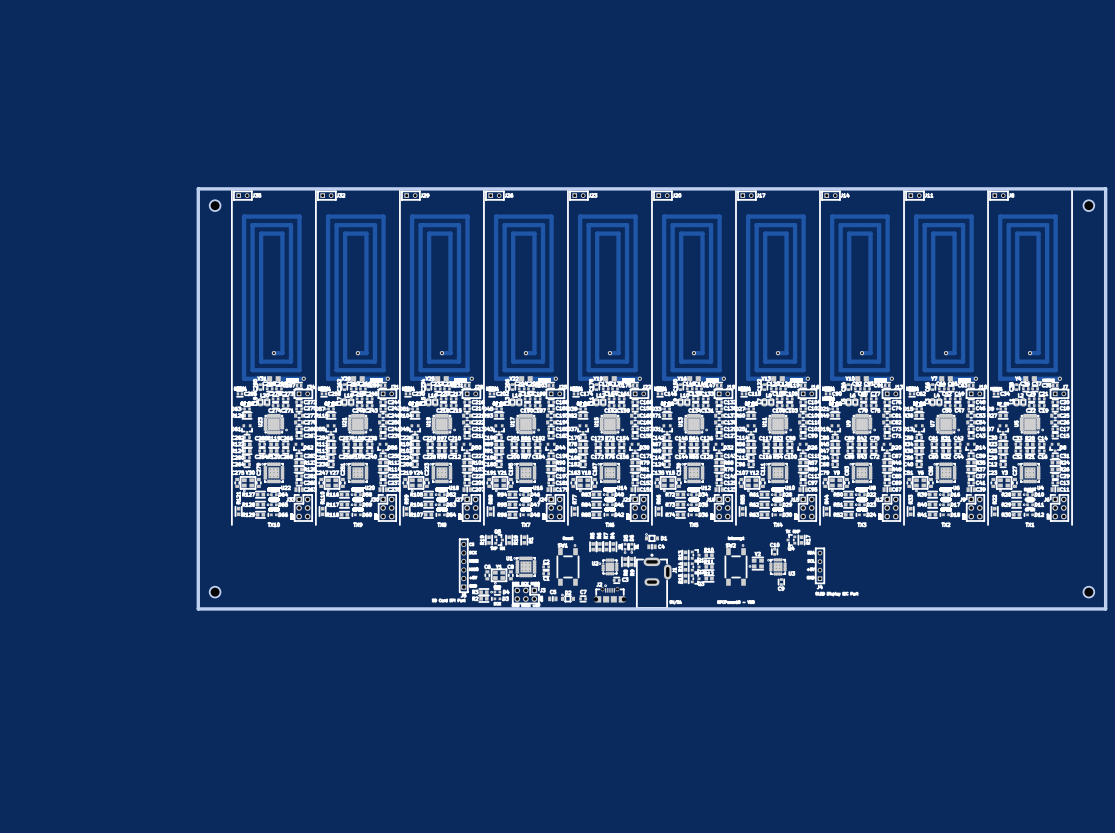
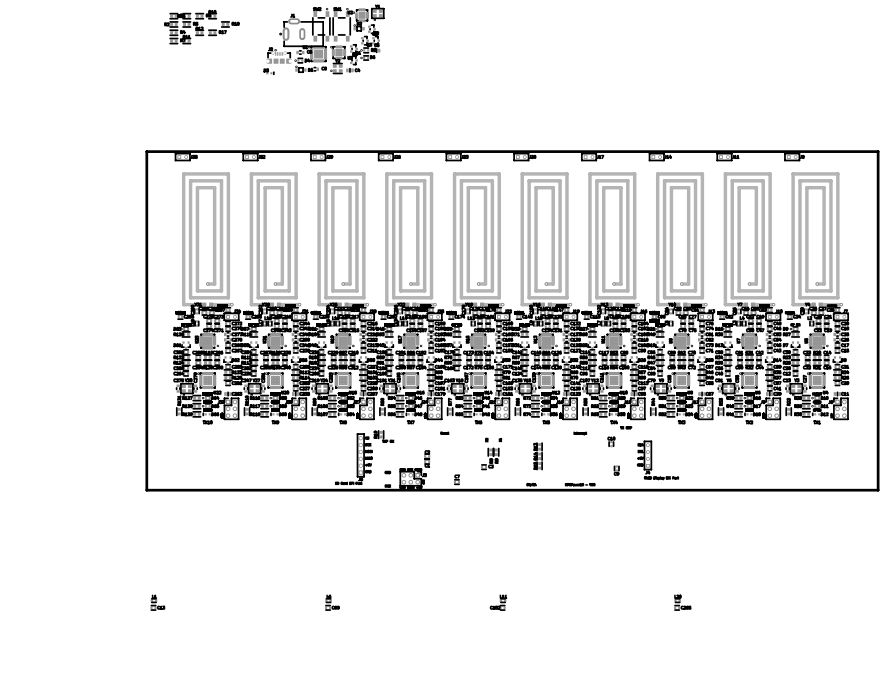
line: (231, 188) (231, 524) -> none
line: (315, 188) (315, 524) -> none
line: (399, 188) (399, 524) -> none
line: (483, 188) (483, 524) -> none
line: (567, 188) (567, 524) -> none
line: (651, 188) (651, 524) -> none
line: (735, 188) (735, 524) -> none
line: (820, 188) (820, 524) -> none
line: (904, 188) (904, 524) -> none
line: (988, 188) (988, 524) -> none
line: (1072, 188) (1072, 524) -> none
part: (215, 205) -> none
part: (1088, 205) -> none
part rotation: 0° (267, 402) -> 90° clockwise (677, 600)
part position: (267, 402) -> (677, 600)
part rotation: 0° (596, 402) -> 90° clockwise (503, 600)
part position: (596, 402) -> (503, 600)
part rotation: 0° (855, 402) -> 90° clockwise (328, 600)
part position: (855, 402) -> (328, 600)
part rotation: 0° (1016, 402) -> 90° clockwise (153, 600)
part position: (1016, 402) -> (153, 600)
part position: (583, 464) -> (502, 607)
part position: (299, 482) -> (677, 607)
part position: (887, 482) -> (328, 607)
part position: (1055, 482) -> (153, 607)
part position: (651, 537) -> (300, 69)
part position: (499, 540) -> (376, 40)
part rotation: 0° (509, 540) -> 90° clockwise (225, 24)
part position: (509, 540) -> (225, 24)
part rotation: 0° (524, 540) -> 90° clockwise (173, 16)
part position: (524, 540) -> (173, 16)
part rotation: 0° (791, 540) -> 180° (353, 60)
part position: (791, 540) -> (353, 60)
part rotation: 0° (801, 540) -> 90° clockwise (212, 32)
part position: (801, 540) -> (212, 32)
part rotation: 0° (593, 546) -> 90° clockwise (186, 24)
part position: (593, 546) -> (186, 24)
part rotation: 0° (599, 546) -> 90° clockwise (199, 16)
part position: (599, 546) -> (199, 16)
part rotation: 0° (606, 546) -> 90° clockwise (173, 41)
part position: (606, 546) -> (173, 41)
part rotation: 0° (613, 546) -> 90° clockwise (173, 32)
part position: (613, 546) -> (173, 32)
part position: (651, 546) -> (349, 70)
part rotation: 0° (625, 548) -> 90° clockwise (365, 50)
part position: (625, 548) -> (365, 50)
part rotation: 0° (631, 548) -> 90° clockwise (365, 57)
part position: (631, 548) -> (365, 57)
part position: (695, 555) -> (353, 48)
part position: (709, 555) -> (212, 16)
part position: (756, 563) -> (336, 68)
part position: (567, 565) -> (341, 25)
part position: (735, 565) -> (321, 25)
part position: (524, 566) -> (317, 54)
part position: (608, 566) -> (360, 15)
part position: (695, 566) -> (371, 29)
part position: (709, 566) -> (186, 41)
part position: (777, 566) -> (338, 52)
part rotation: 0° (487, 575) -> 90° clockwise (300, 52)
part position: (487, 575) -> (300, 52)
part rotation: 0° (510, 575) -> 90° clockwise (314, 69)
part position: (510, 575) -> (314, 69)
part position: (499, 576) -> (377, 14)
part position: (695, 578) -> (365, 40)
part position: (709, 578) -> (199, 32)
part rotation: 0° (654, 580) -> 90° counterclockwise (301, 32)
part position: (654, 580) -> (301, 32)
part: (215, 592) -> none
part position: (483, 592) -> (186, 16)
part position: (495, 592) -> (299, 60)
part: (1088, 592) -> none
part position: (609, 593) -> (279, 56)
part position: (567, 597) -> (359, 27)
part position: (483, 598) -> (173, 24)
part rotation: 0° (496, 598) -> 180° (270, 73)
part position: (496, 598) -> (270, 73)
part position: (552, 598) -> (376, 50)

